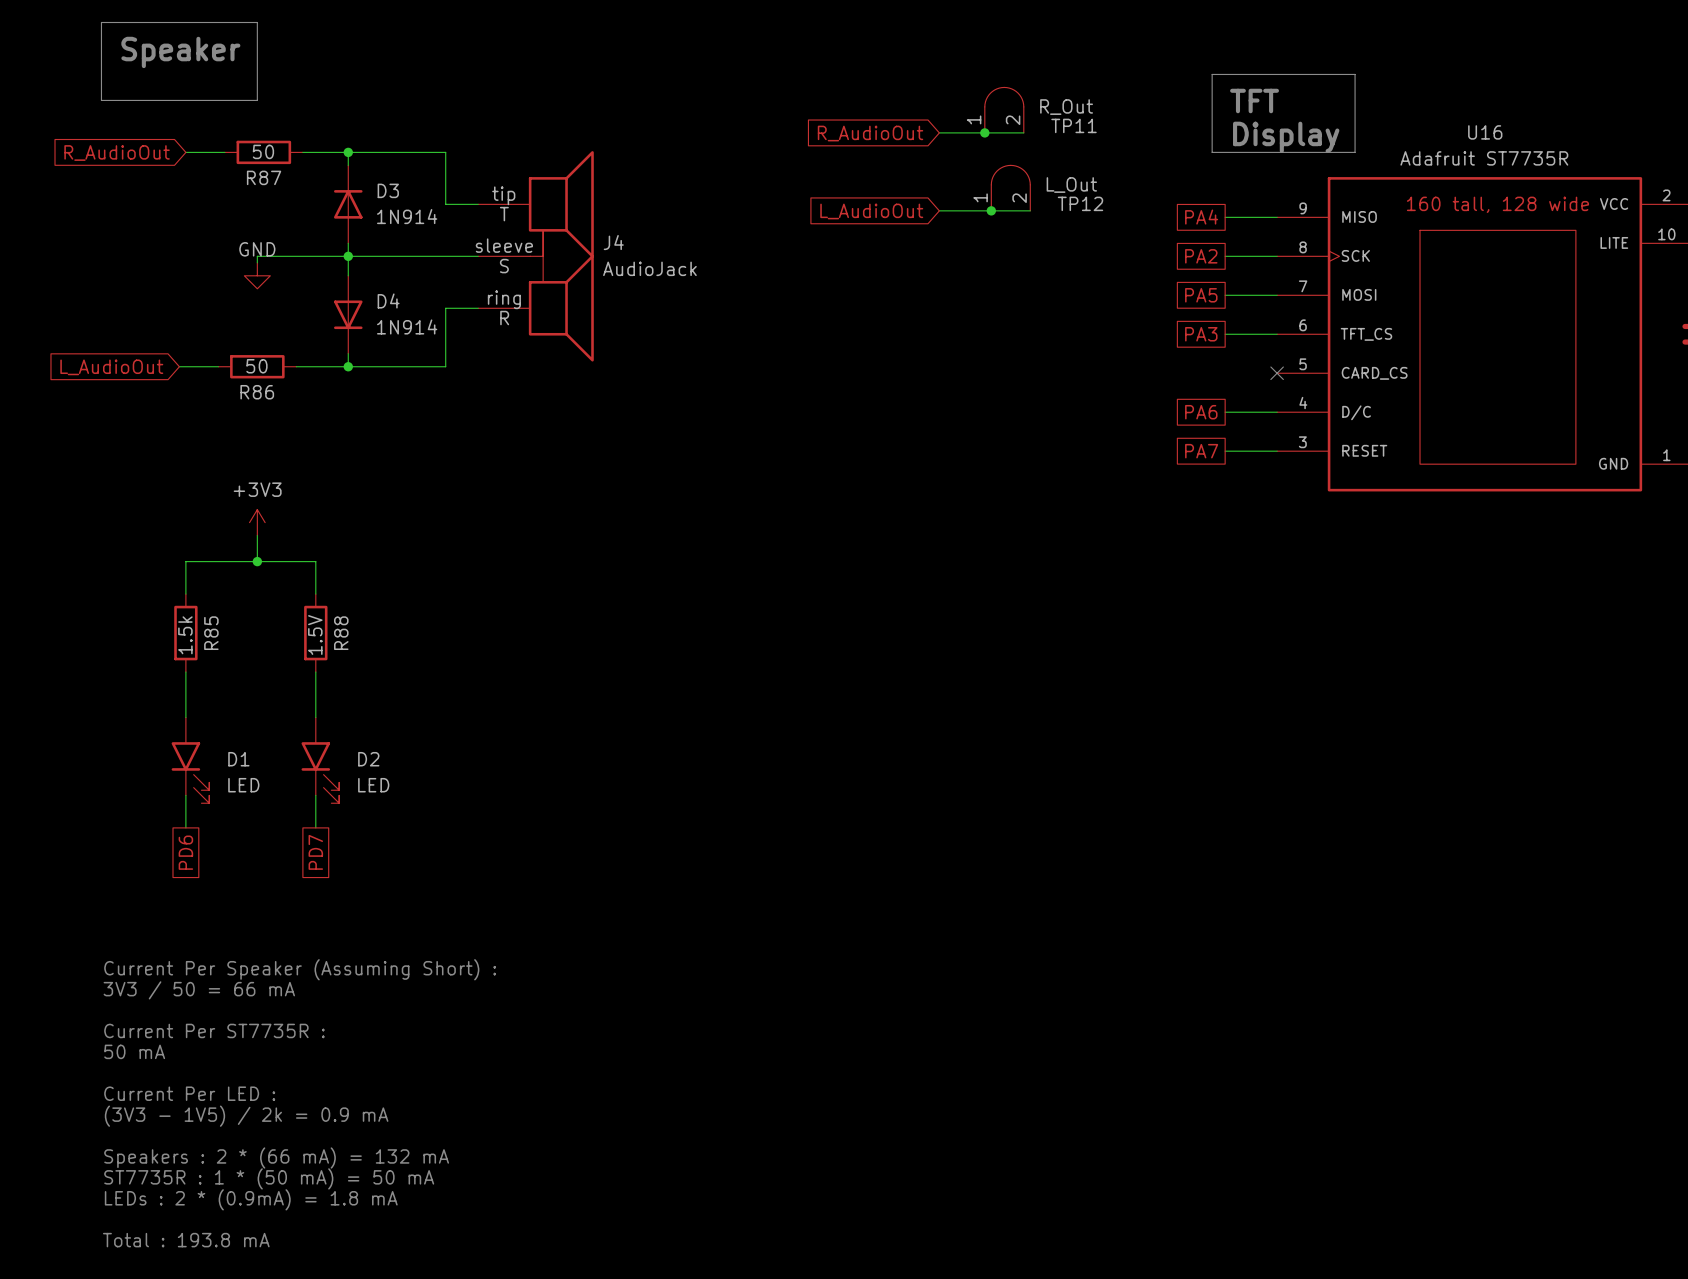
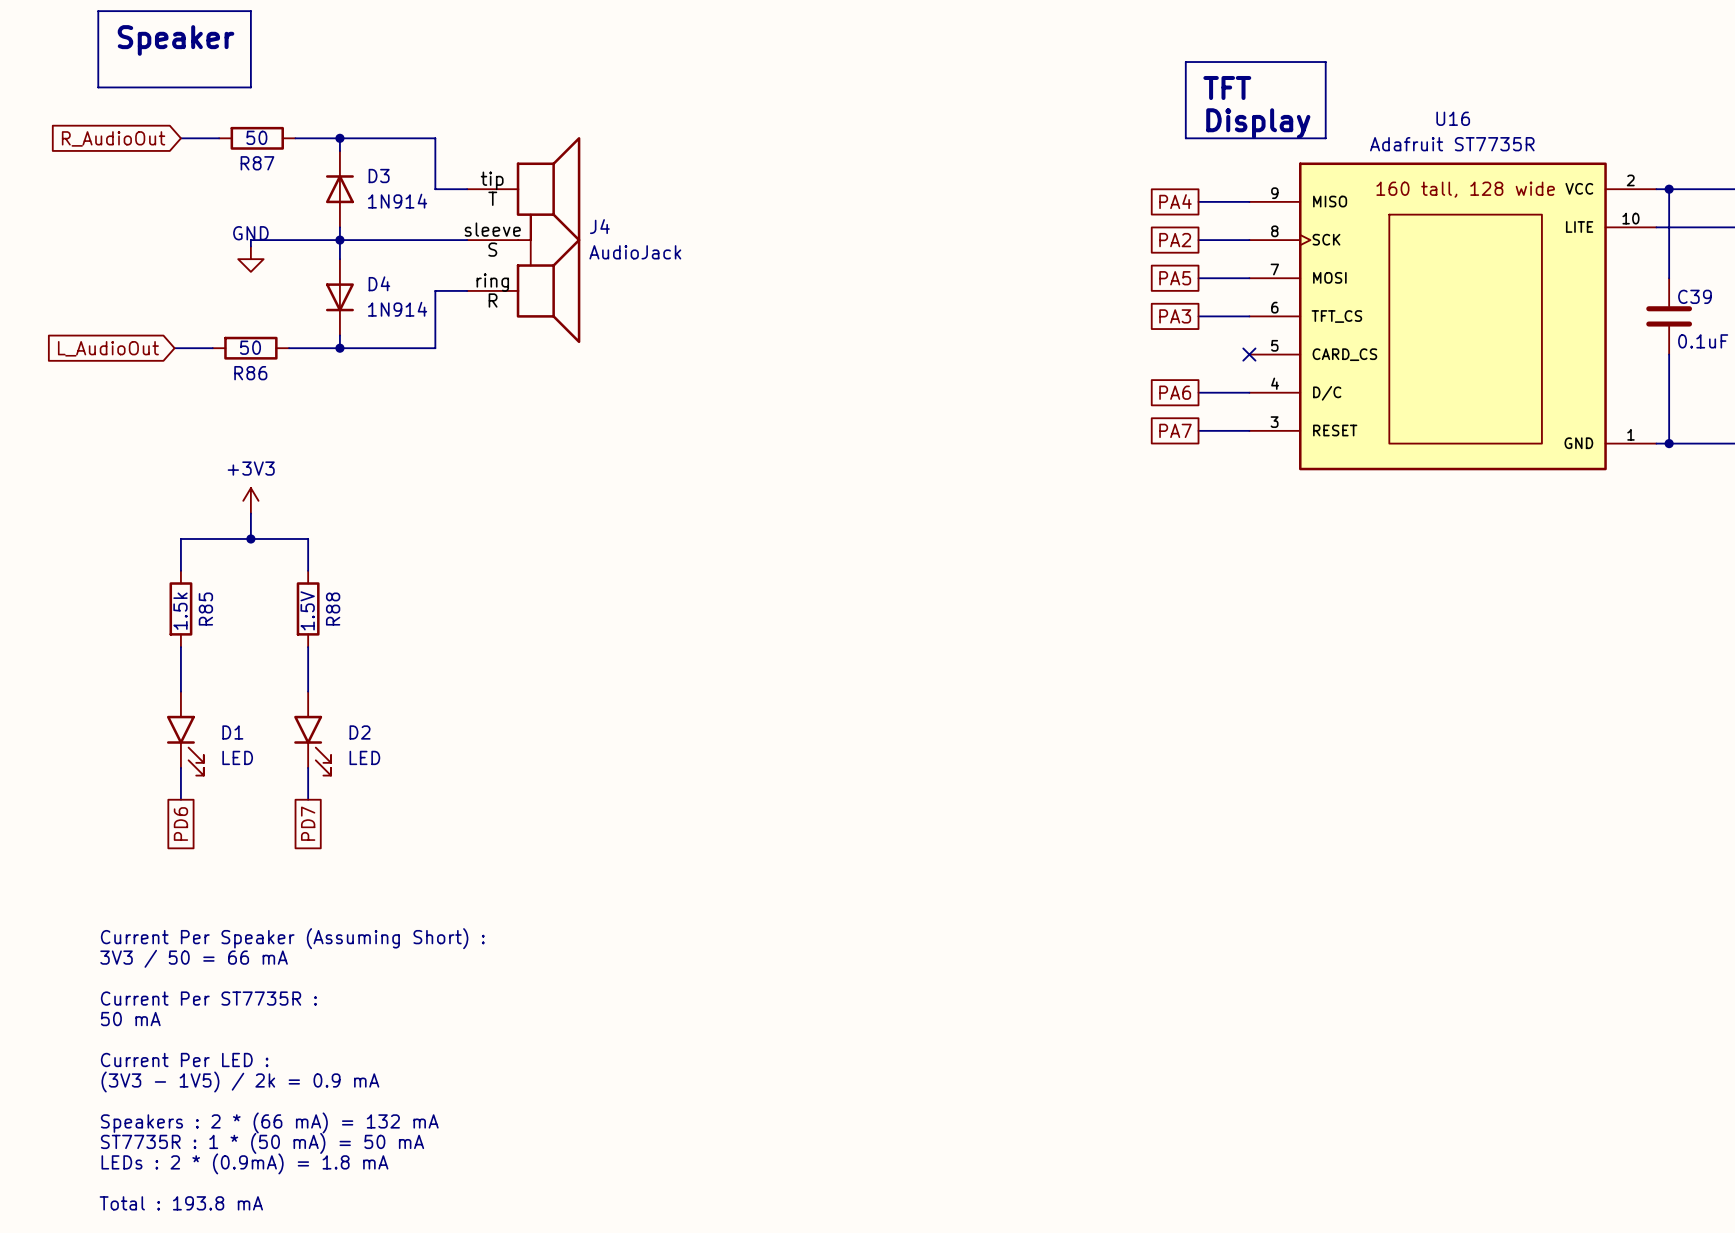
TP11: R_Out (1004, 110) -> none
wire: (939, 132) (1023, 132) -> none
junction: (984, 132) -> none
global label: R_AudioOut (870, 133) -> none
TP12: L_Out (1010, 188) -> none
wire: (939, 210) (1030, 210) -> none
junction: (991, 210) -> none
global label: L_AudioOut (871, 211) -> none

